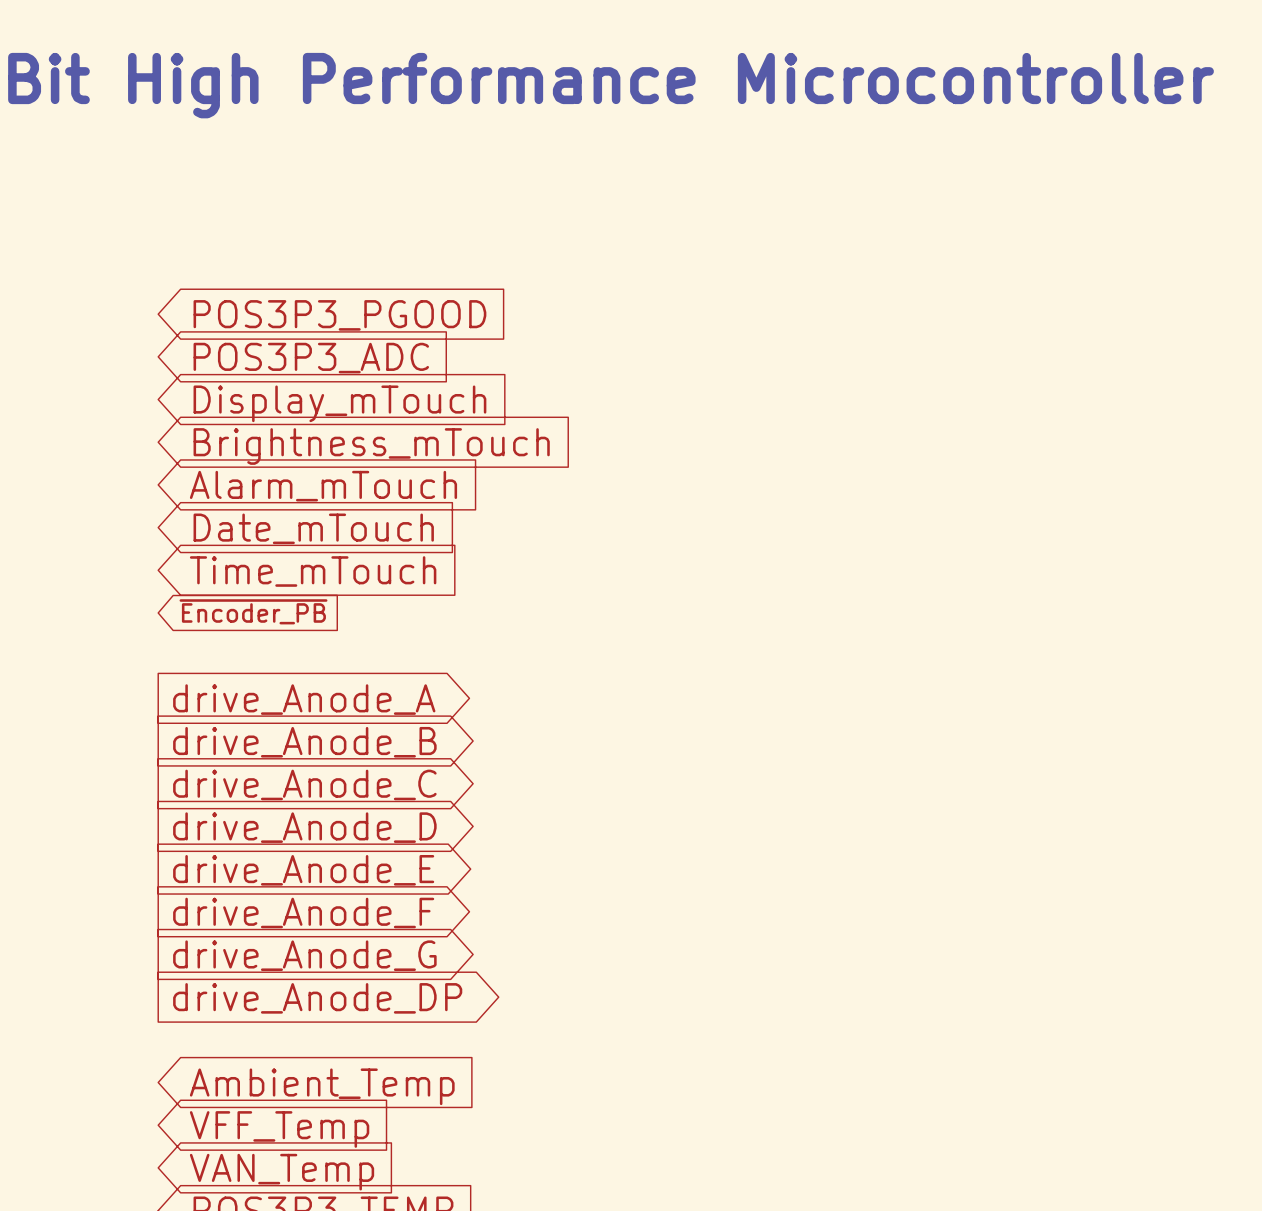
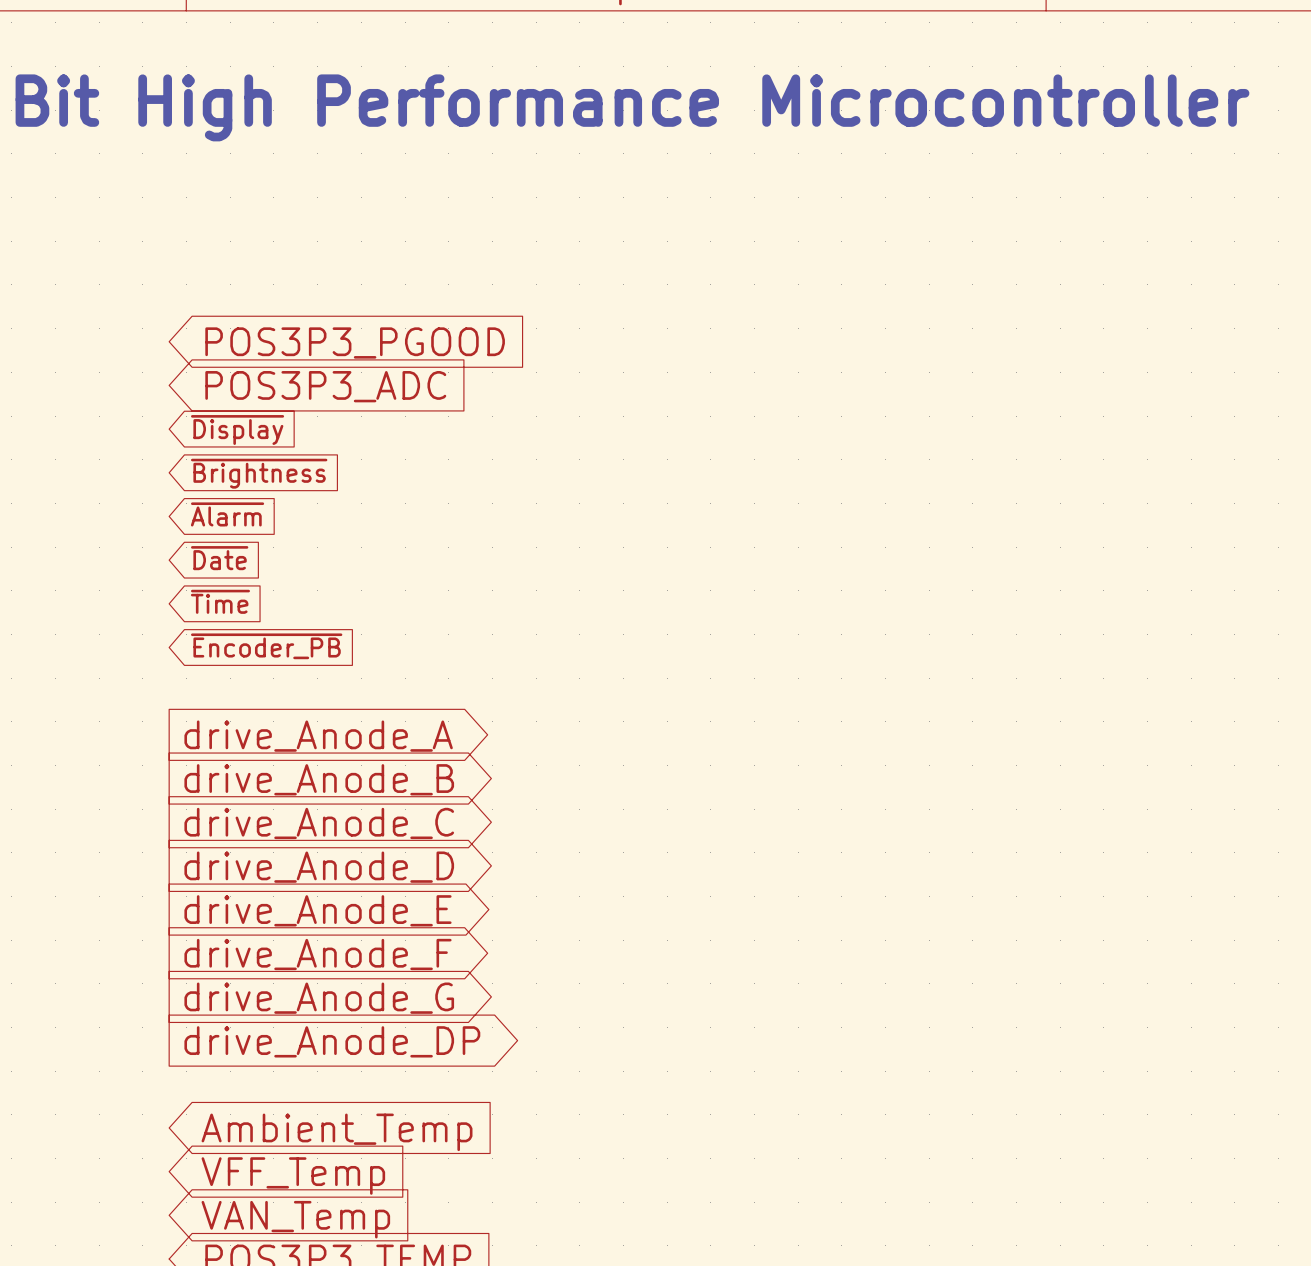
global label: Display_mTouch (339, 403) -> ~{Display} (237, 430)
global label: Brightness_mTouch (371, 446) -> ~{Brightness} (259, 473)
global label: Alarm_mTouch (323, 486) -> ~{Alarm} (227, 514)
global label: Date_mTouch (313, 528) -> ~{Date} (219, 558)
global label: Time_mTouch (313, 571) -> ~{Time} (220, 601)

